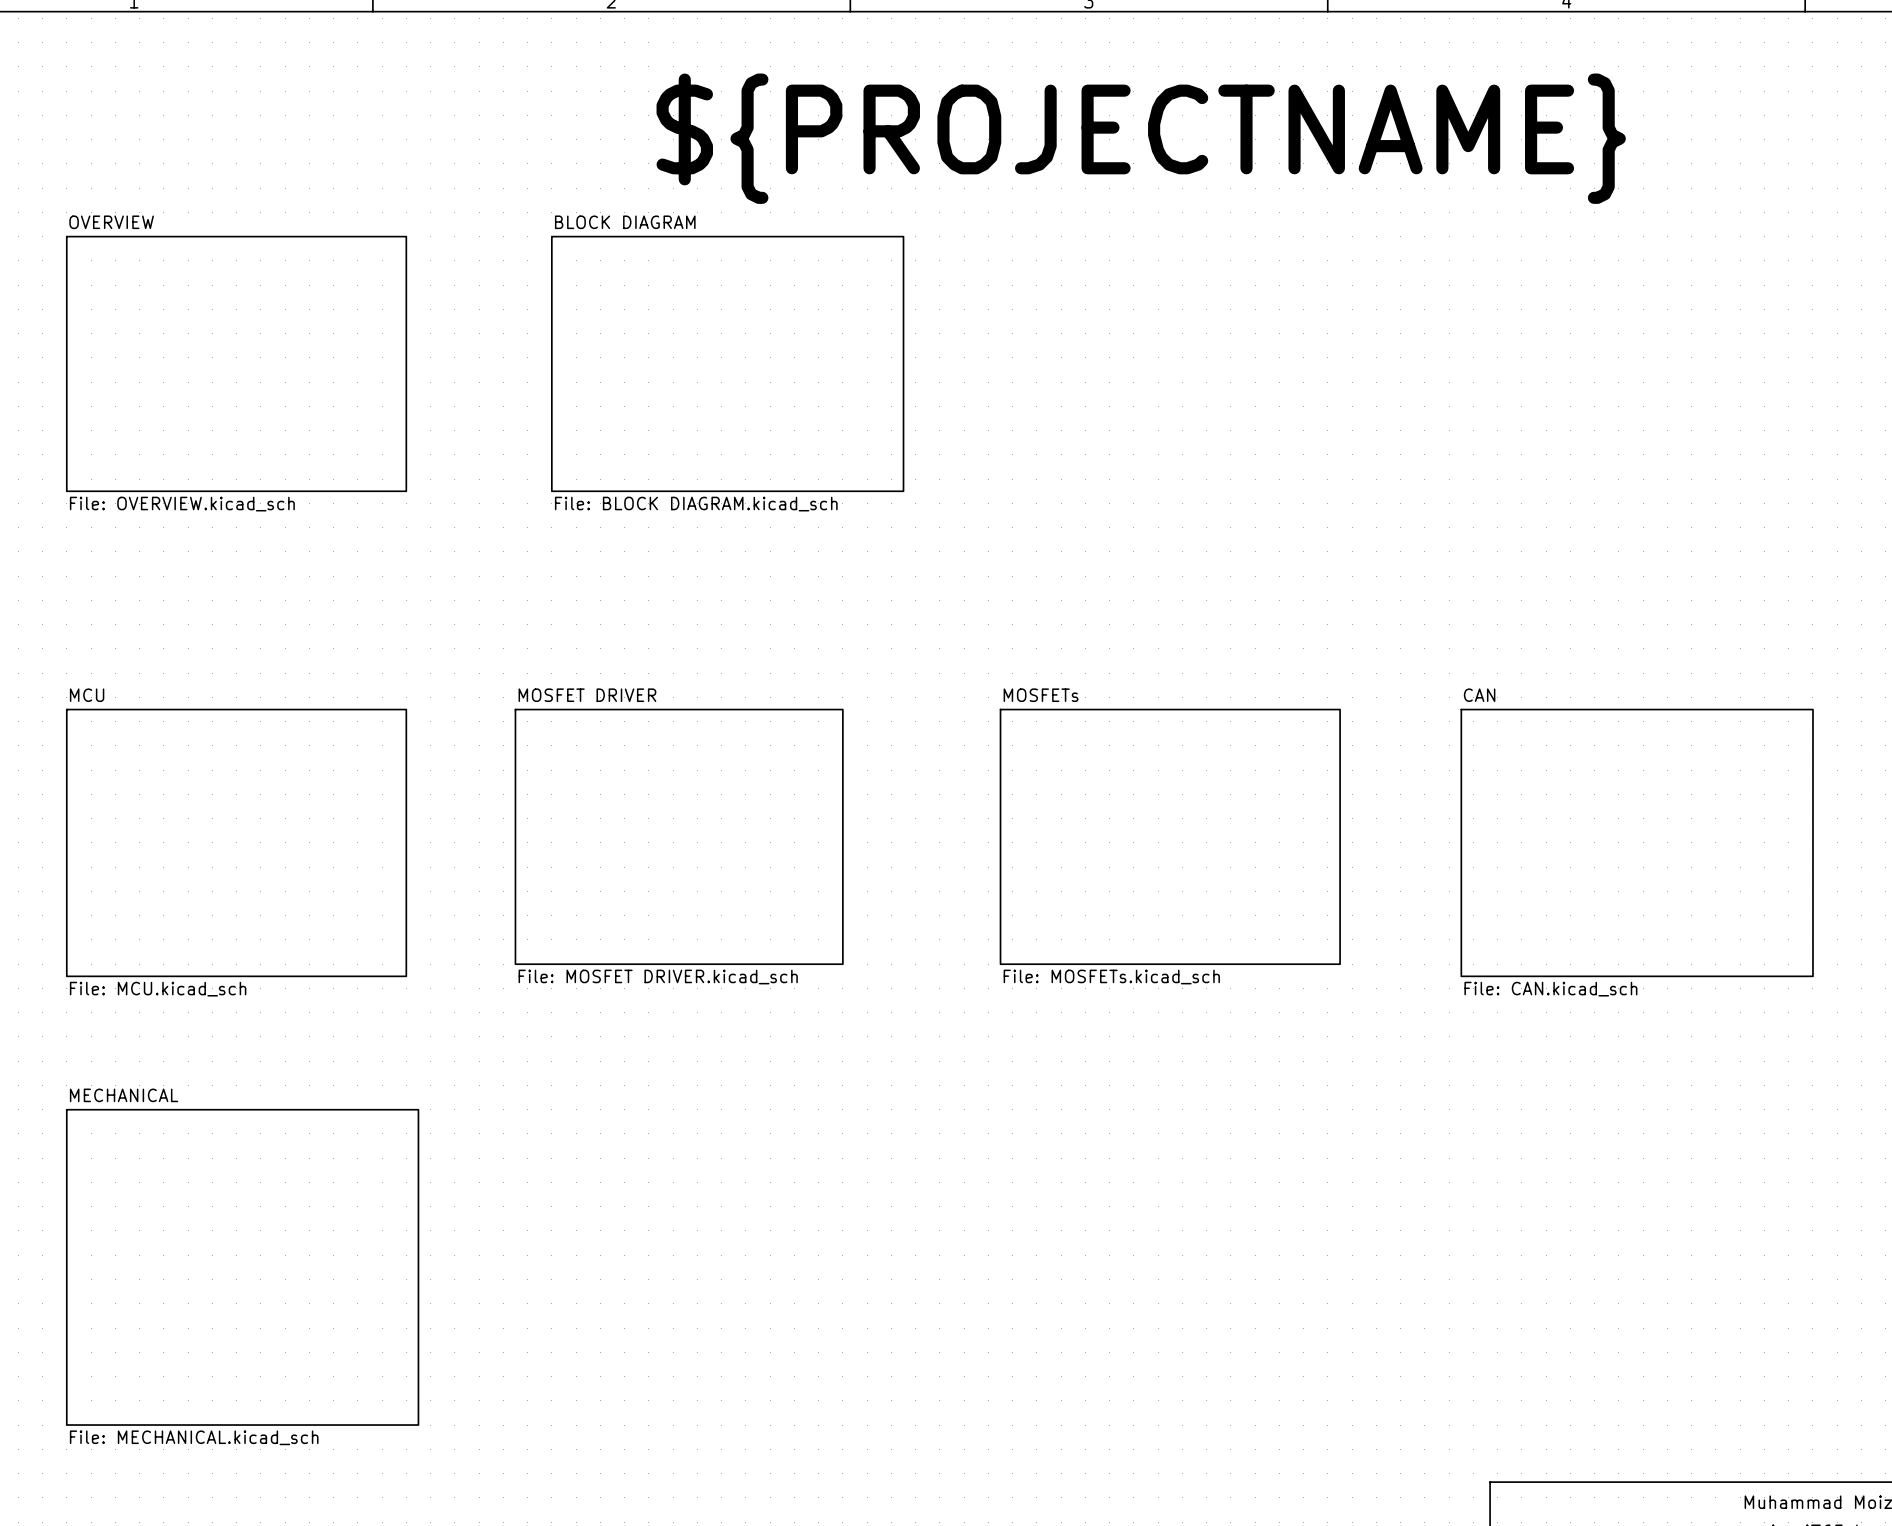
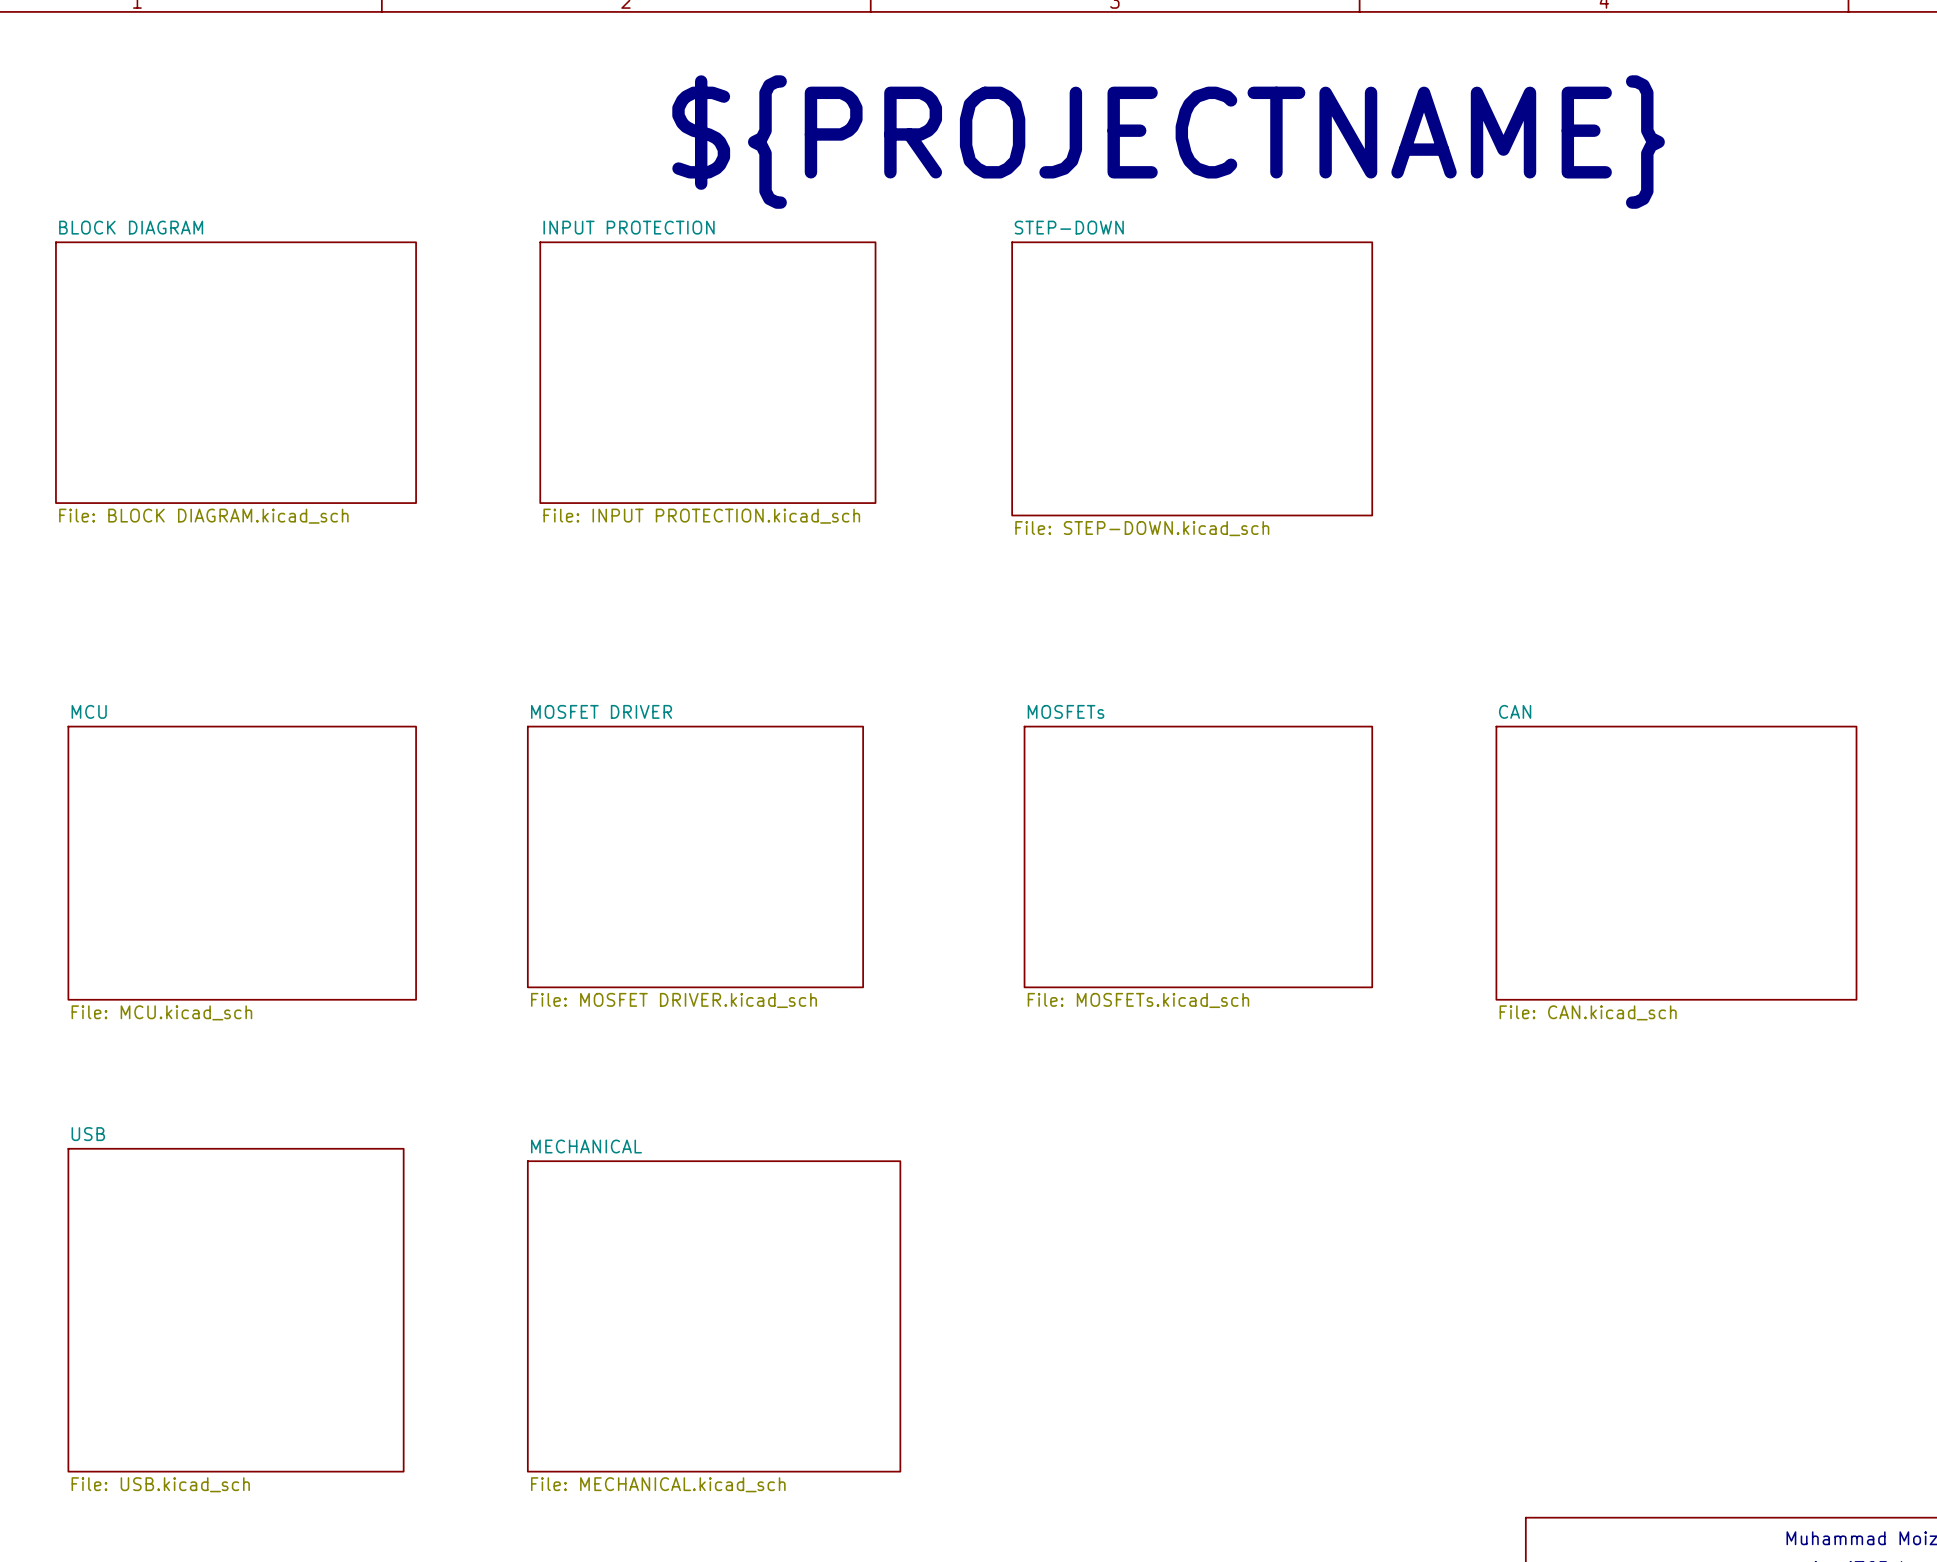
sheet BLOCK DIAGRAM: none -> File: BLOCK DIAGRAM.kicad_sch (236, 372)
sheet OVERVIEW: File: OVERVIEW.kicad_sch (236, 363) -> none
sheet INPUT PROTECTION: none -> File: INPUT PROTECTION.kicad_sch (707, 372)
sheet BLOCK DIAGRAM: File: BLOCK DIAGRAM.kicad_sch (727, 363) -> none
sheet STEP-DOWN: none -> File: STEP-DOWN.kicad_sch (1192, 378)
sheet MECHANICAL: File: MECHANICAL.kicad_sch (242, 1267) -> none
sheet USB: none -> File: USB.kicad_sch (236, 1310)
sheet MECHANICAL: none -> File: MECHANICAL.kicad_sch (714, 1316)

